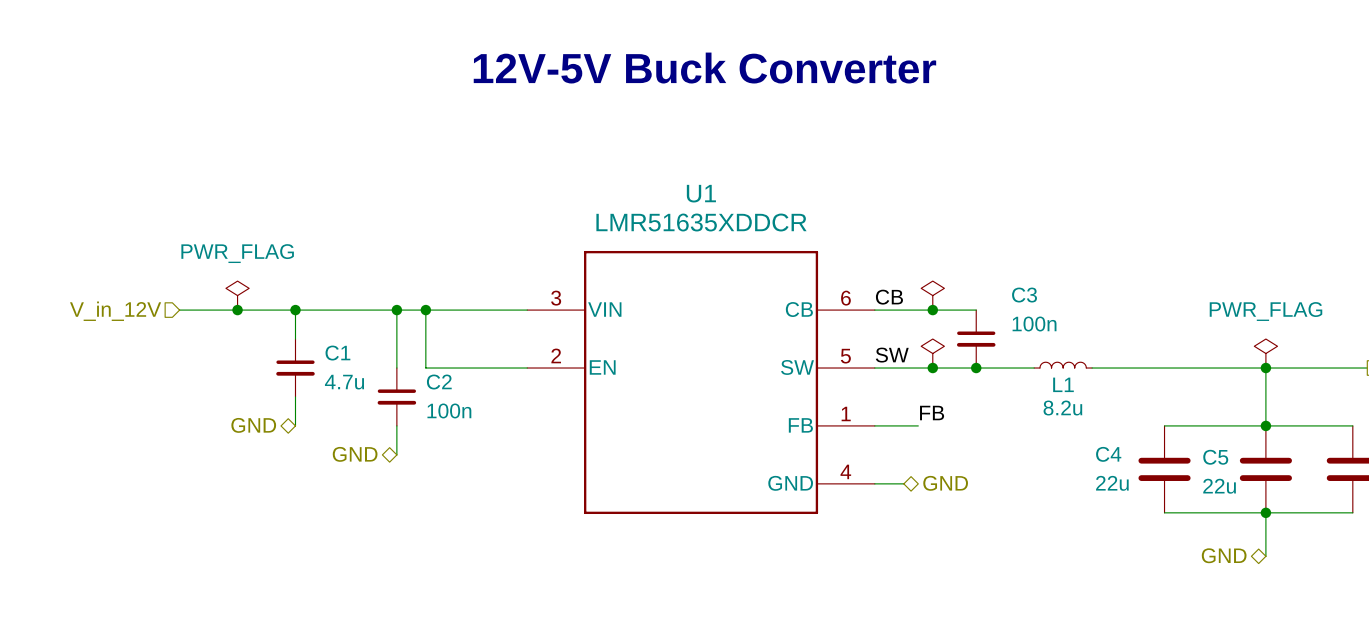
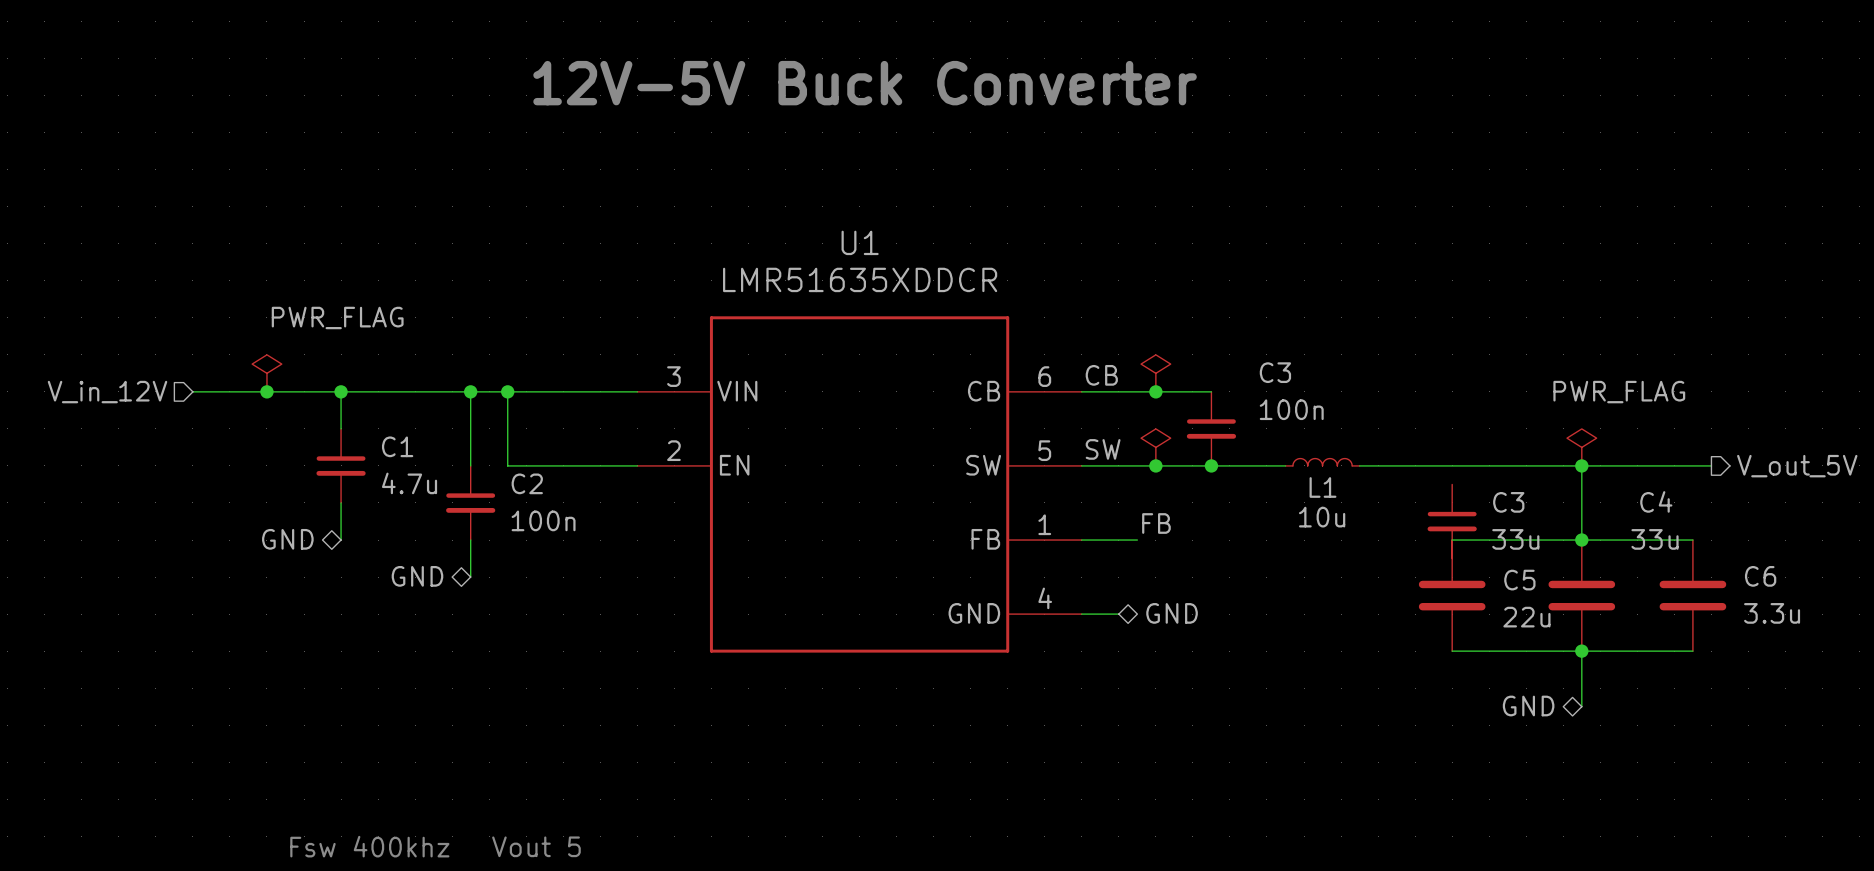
power symbol text position: PWR_FLAG (237, 253) -> PWR_FLAG (1619, 392)
power symbol: PWR_FLAG (1265, 353) -> 33u (1581, 447)
L1 value: 8.2u (1062, 408) -> 10u (1322, 517)
C3: none -> 33u (1452, 521)
C4: 22u (1164, 469) -> none
power symbol: none -> PWR_FLAG (1452, 595)

